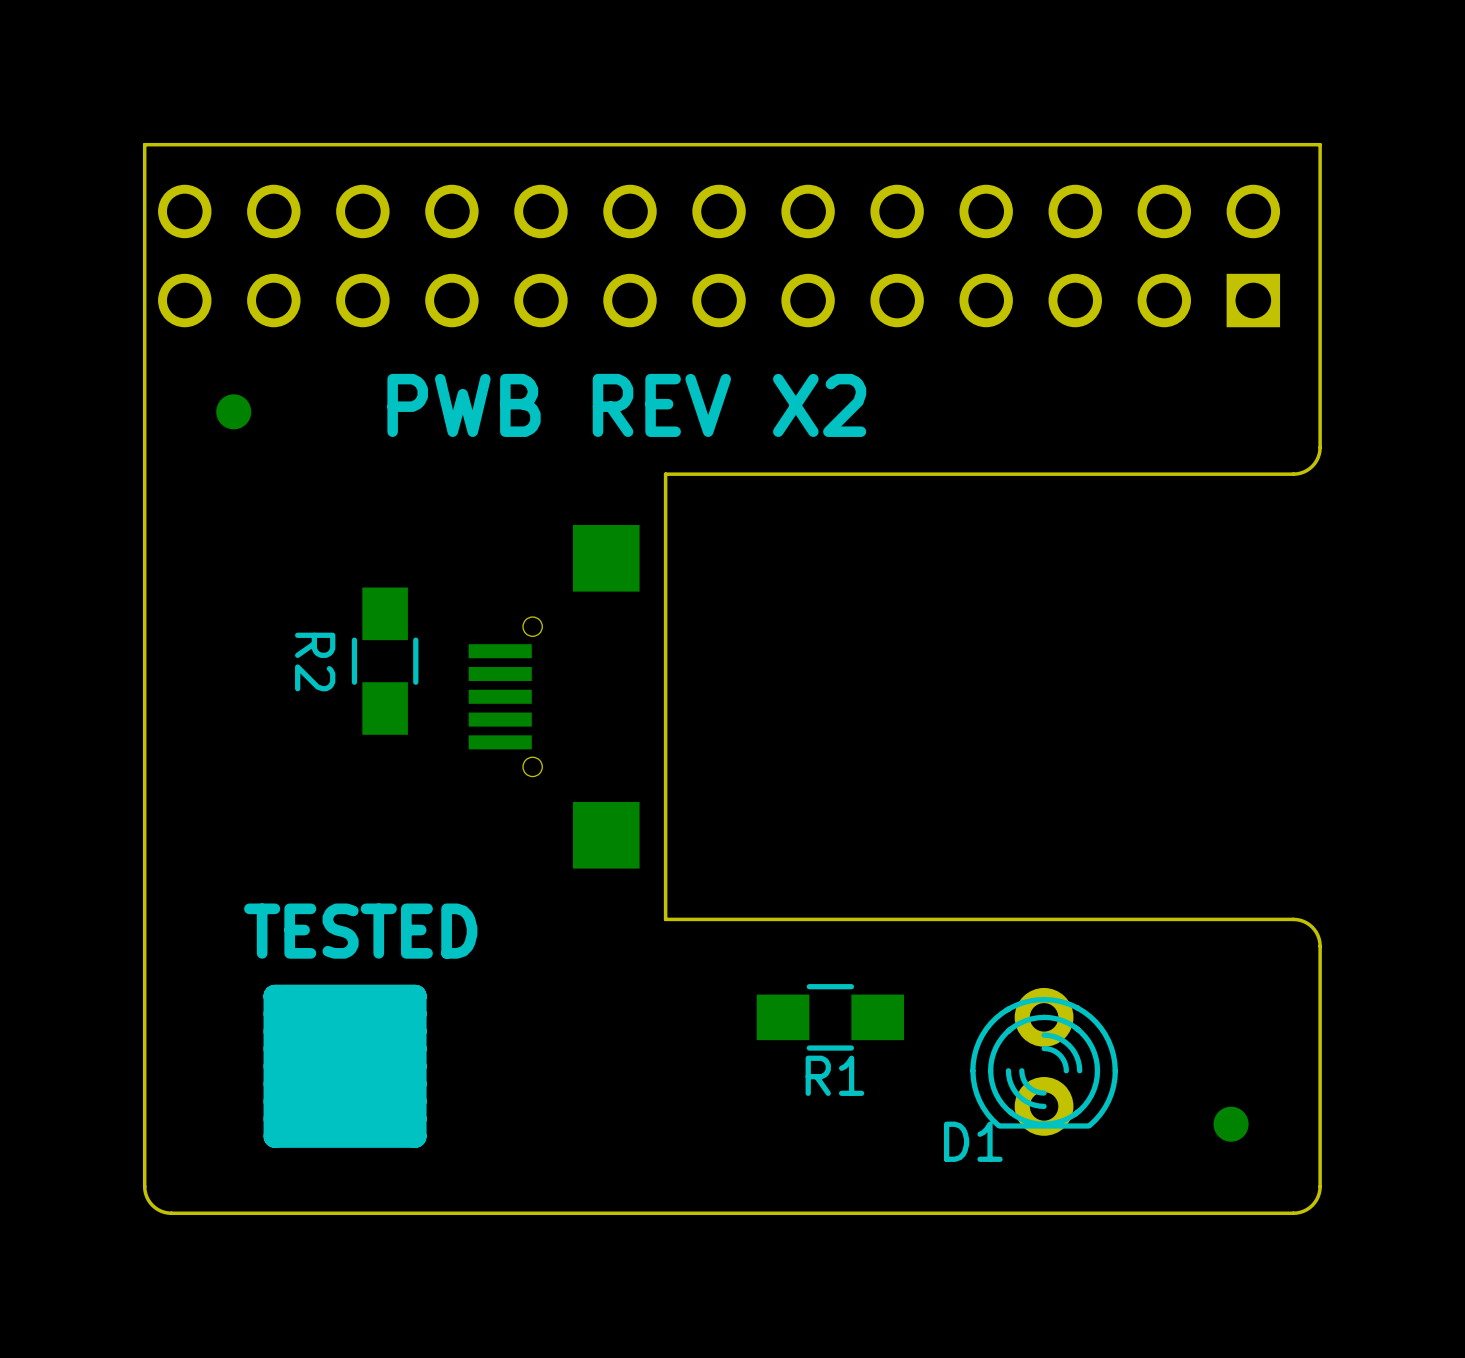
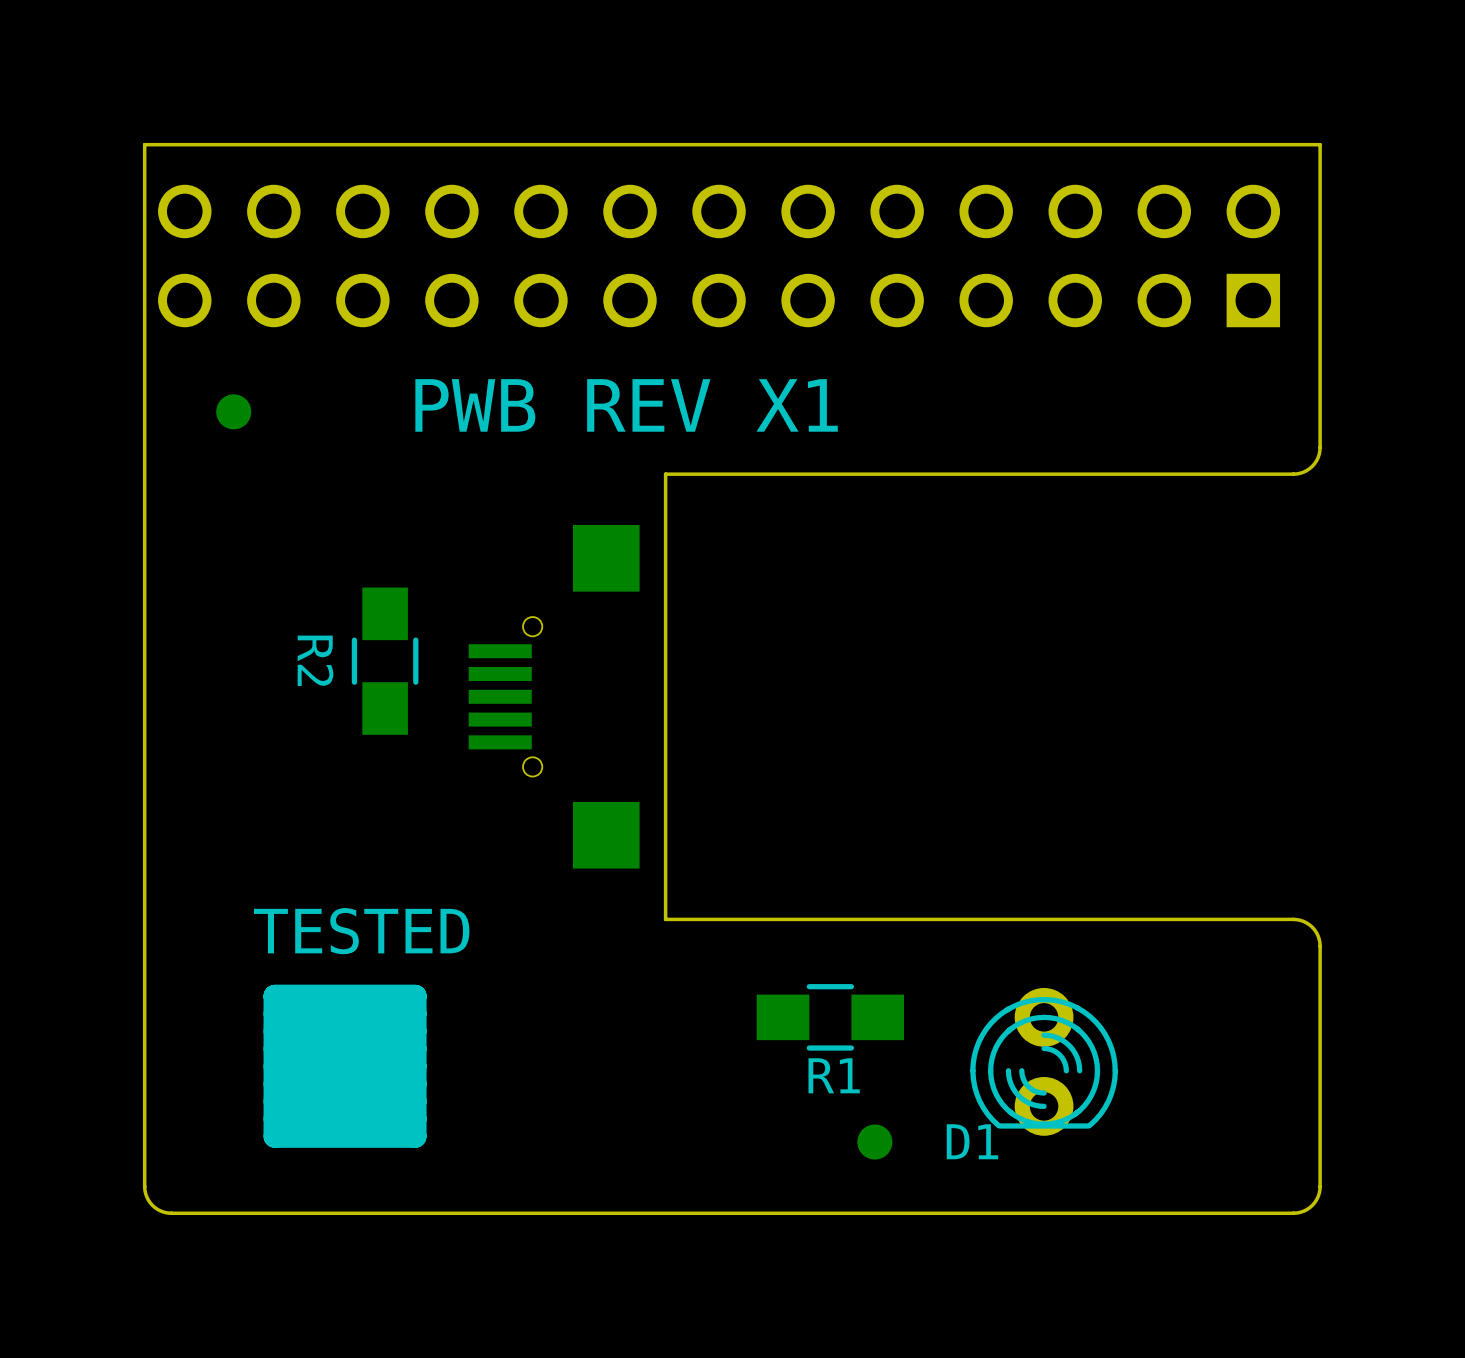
text: PWB REV X2 (626, 405) -> PWB REV X1 (626, 405)
part position: (1231, 1124) -> (874, 1142)

